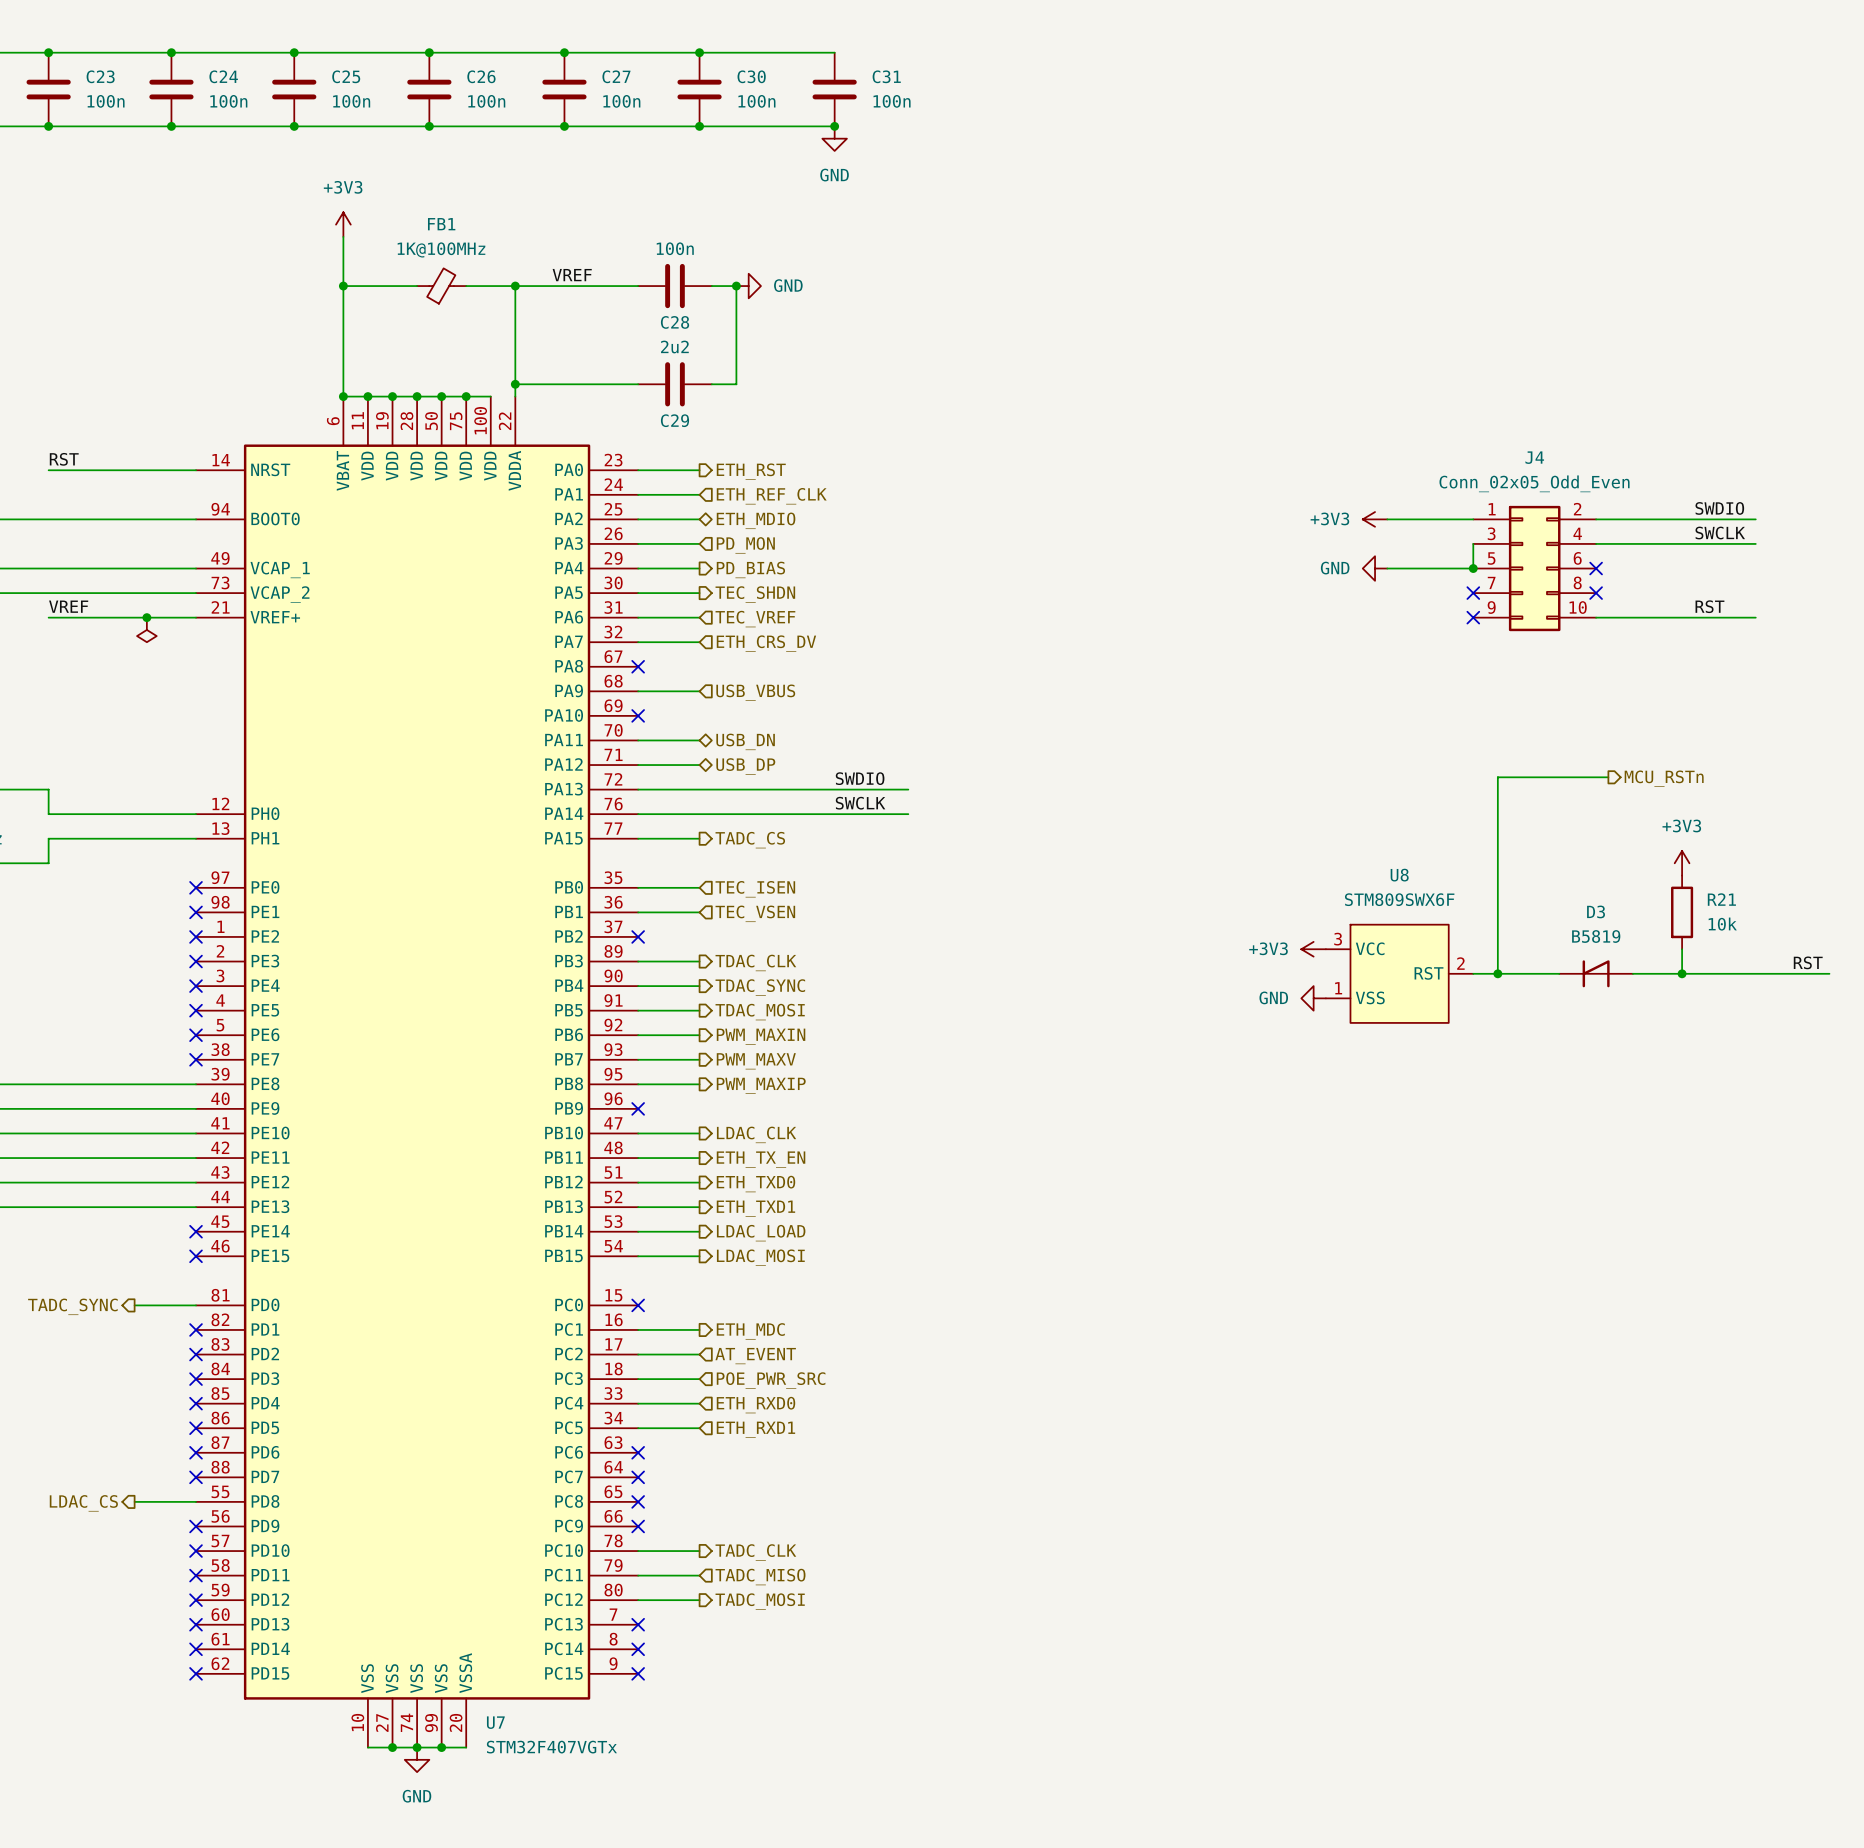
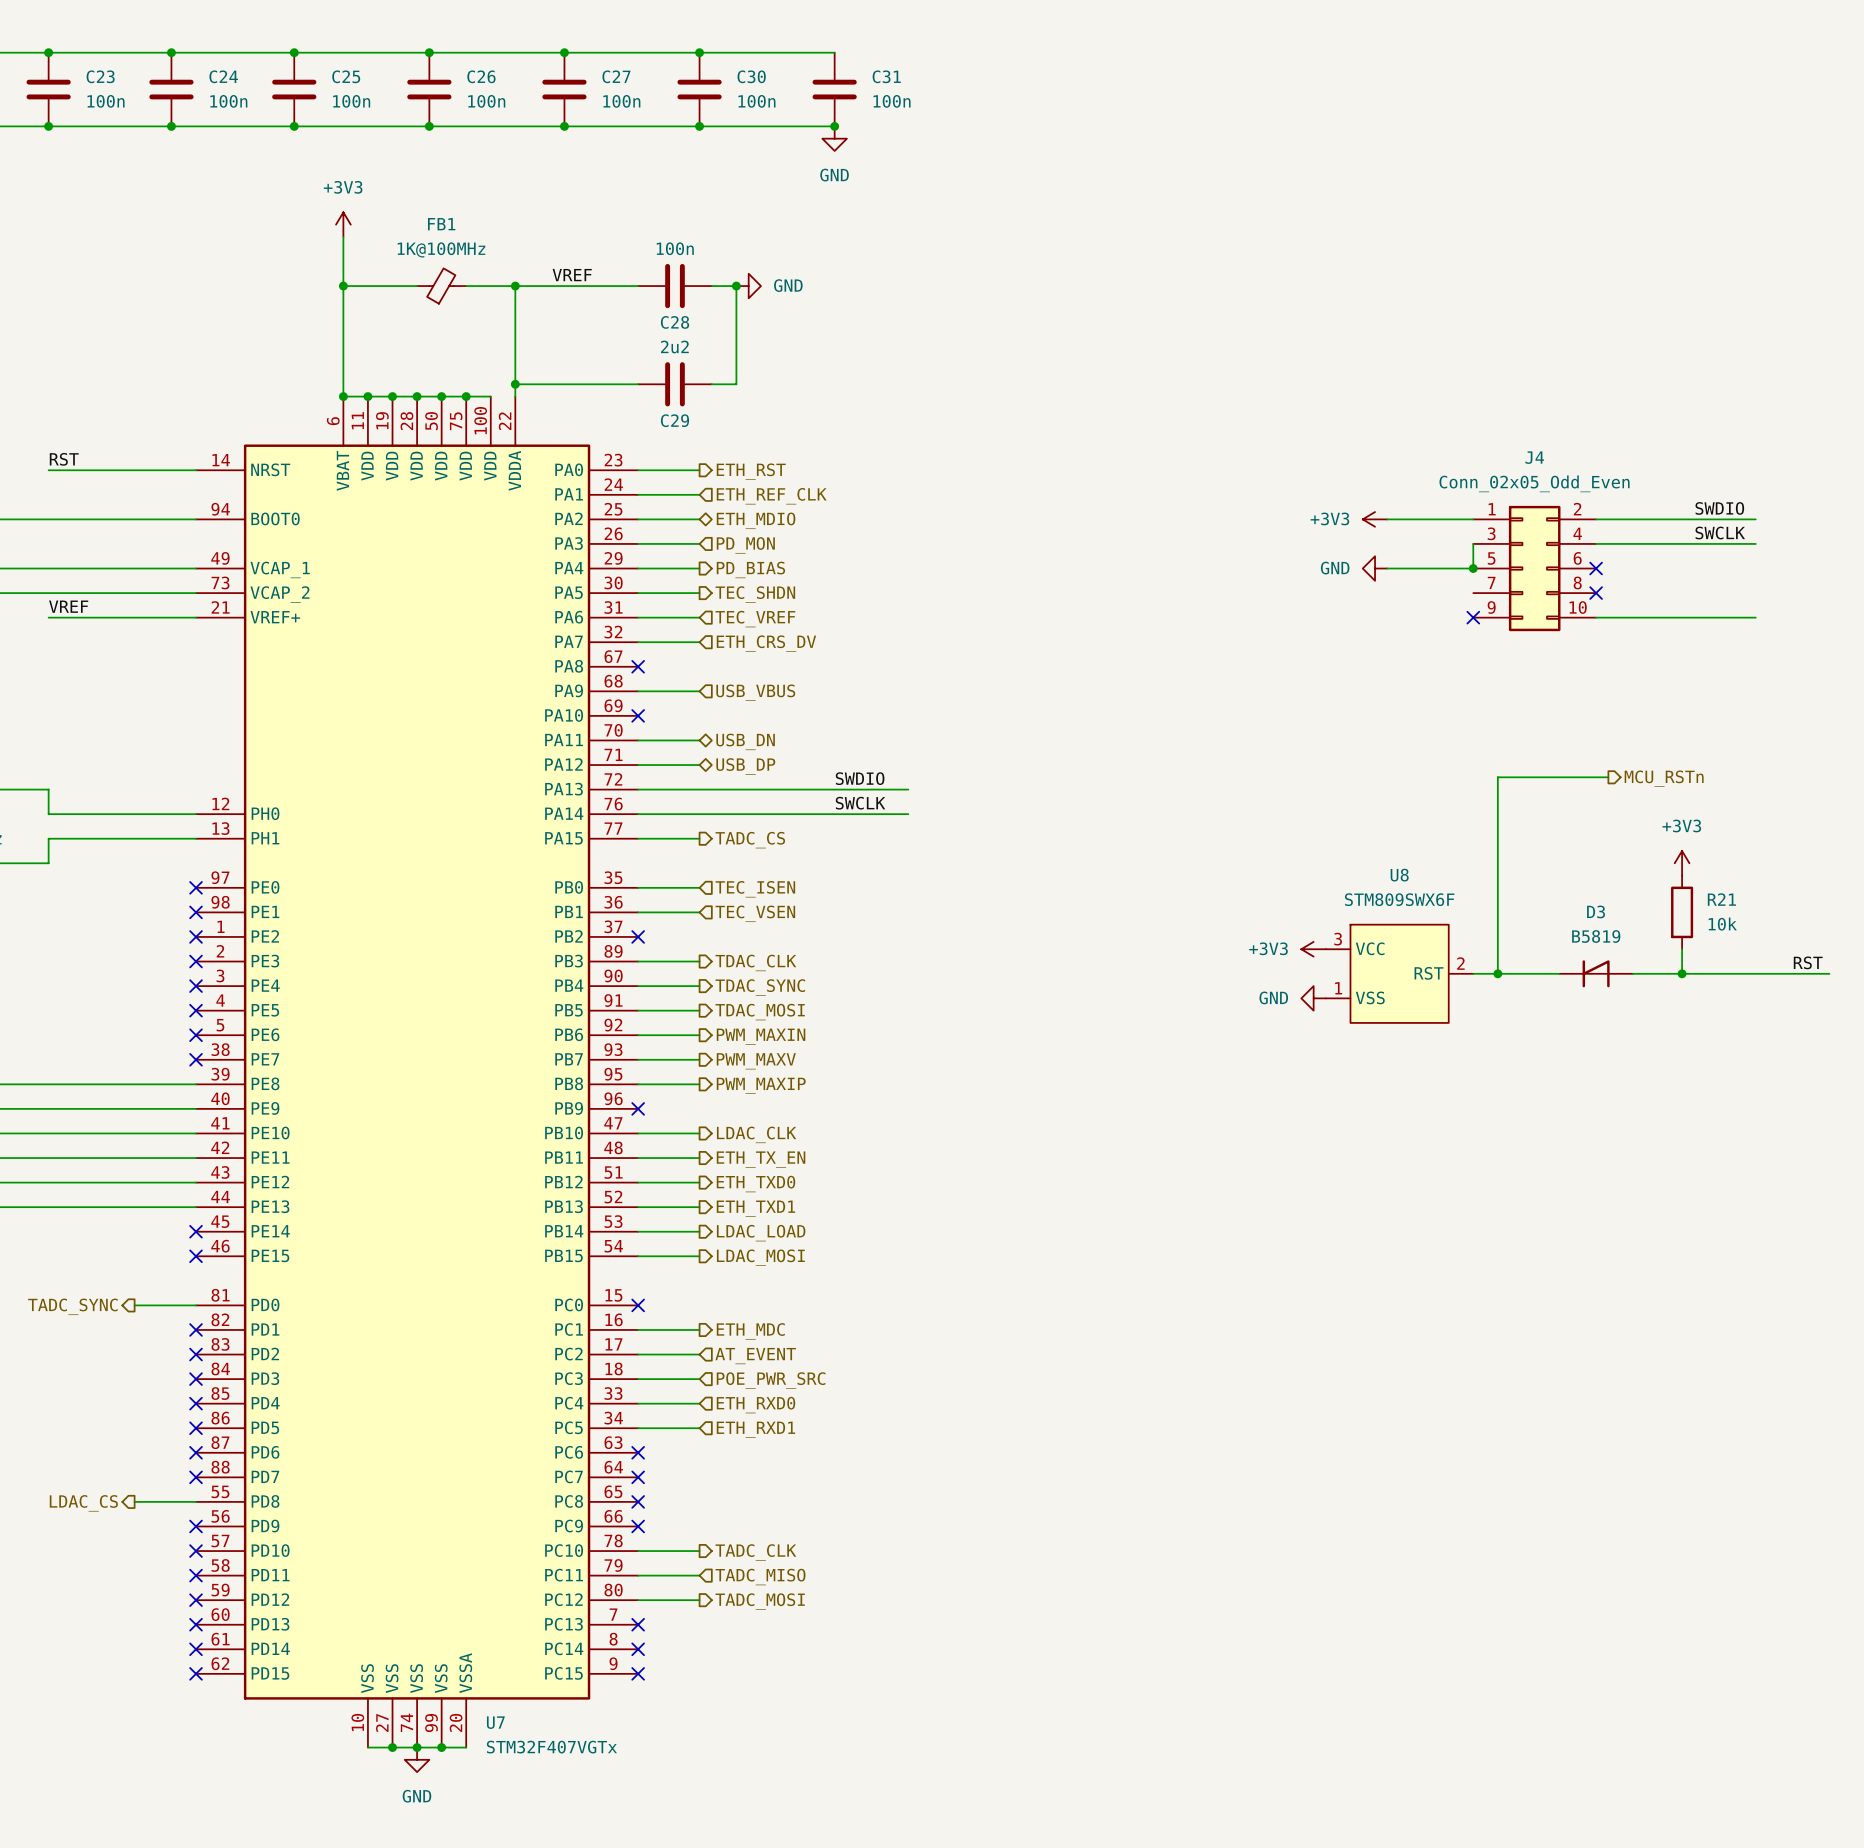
no-connect mark: (1473, 593) -> none
label: RST (1709, 606) -> none
junction: (146, 617) -> none
power symbol: (146, 629) -> none

